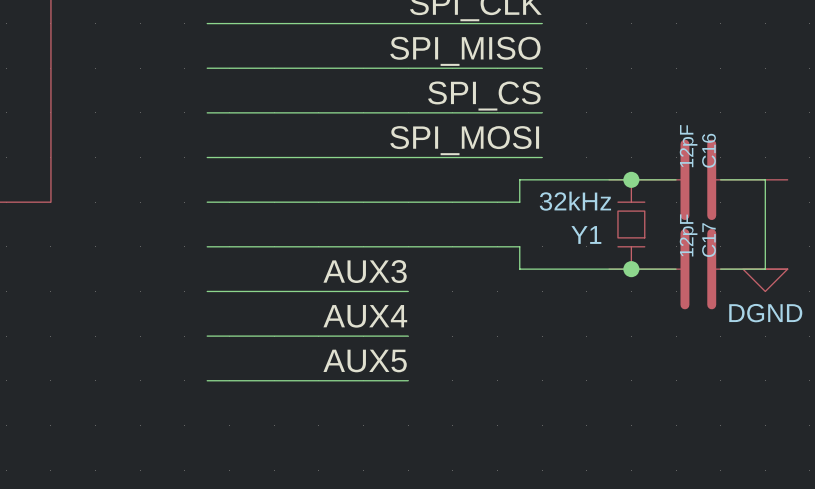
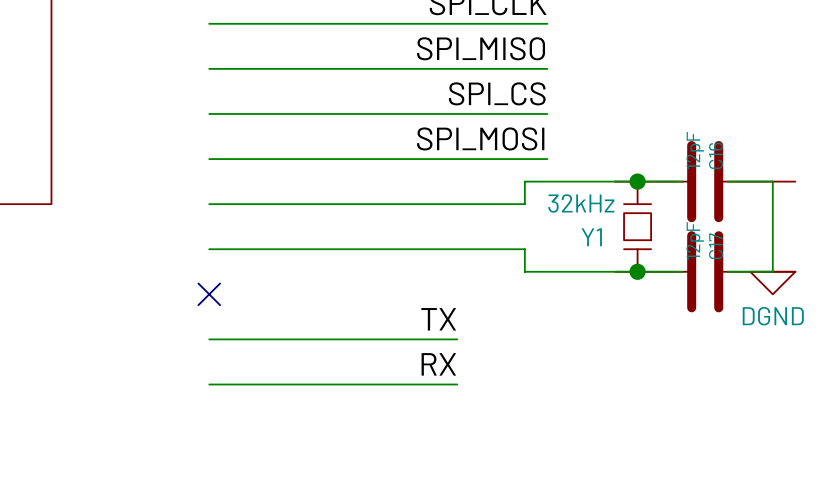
label: AUX3 (365, 271) -> none
wire: (207, 291) (408, 291) -> none
no-connect mark: none -> (209, 294)
label: AUX4 (365, 316) -> none
label: none -> TX (438, 319)
wire: none -> (412, 339) (457, 339)
label: AUX5 (365, 360) -> none
label: none -> RX (438, 364)
wire: none -> (412, 384) (457, 384)

